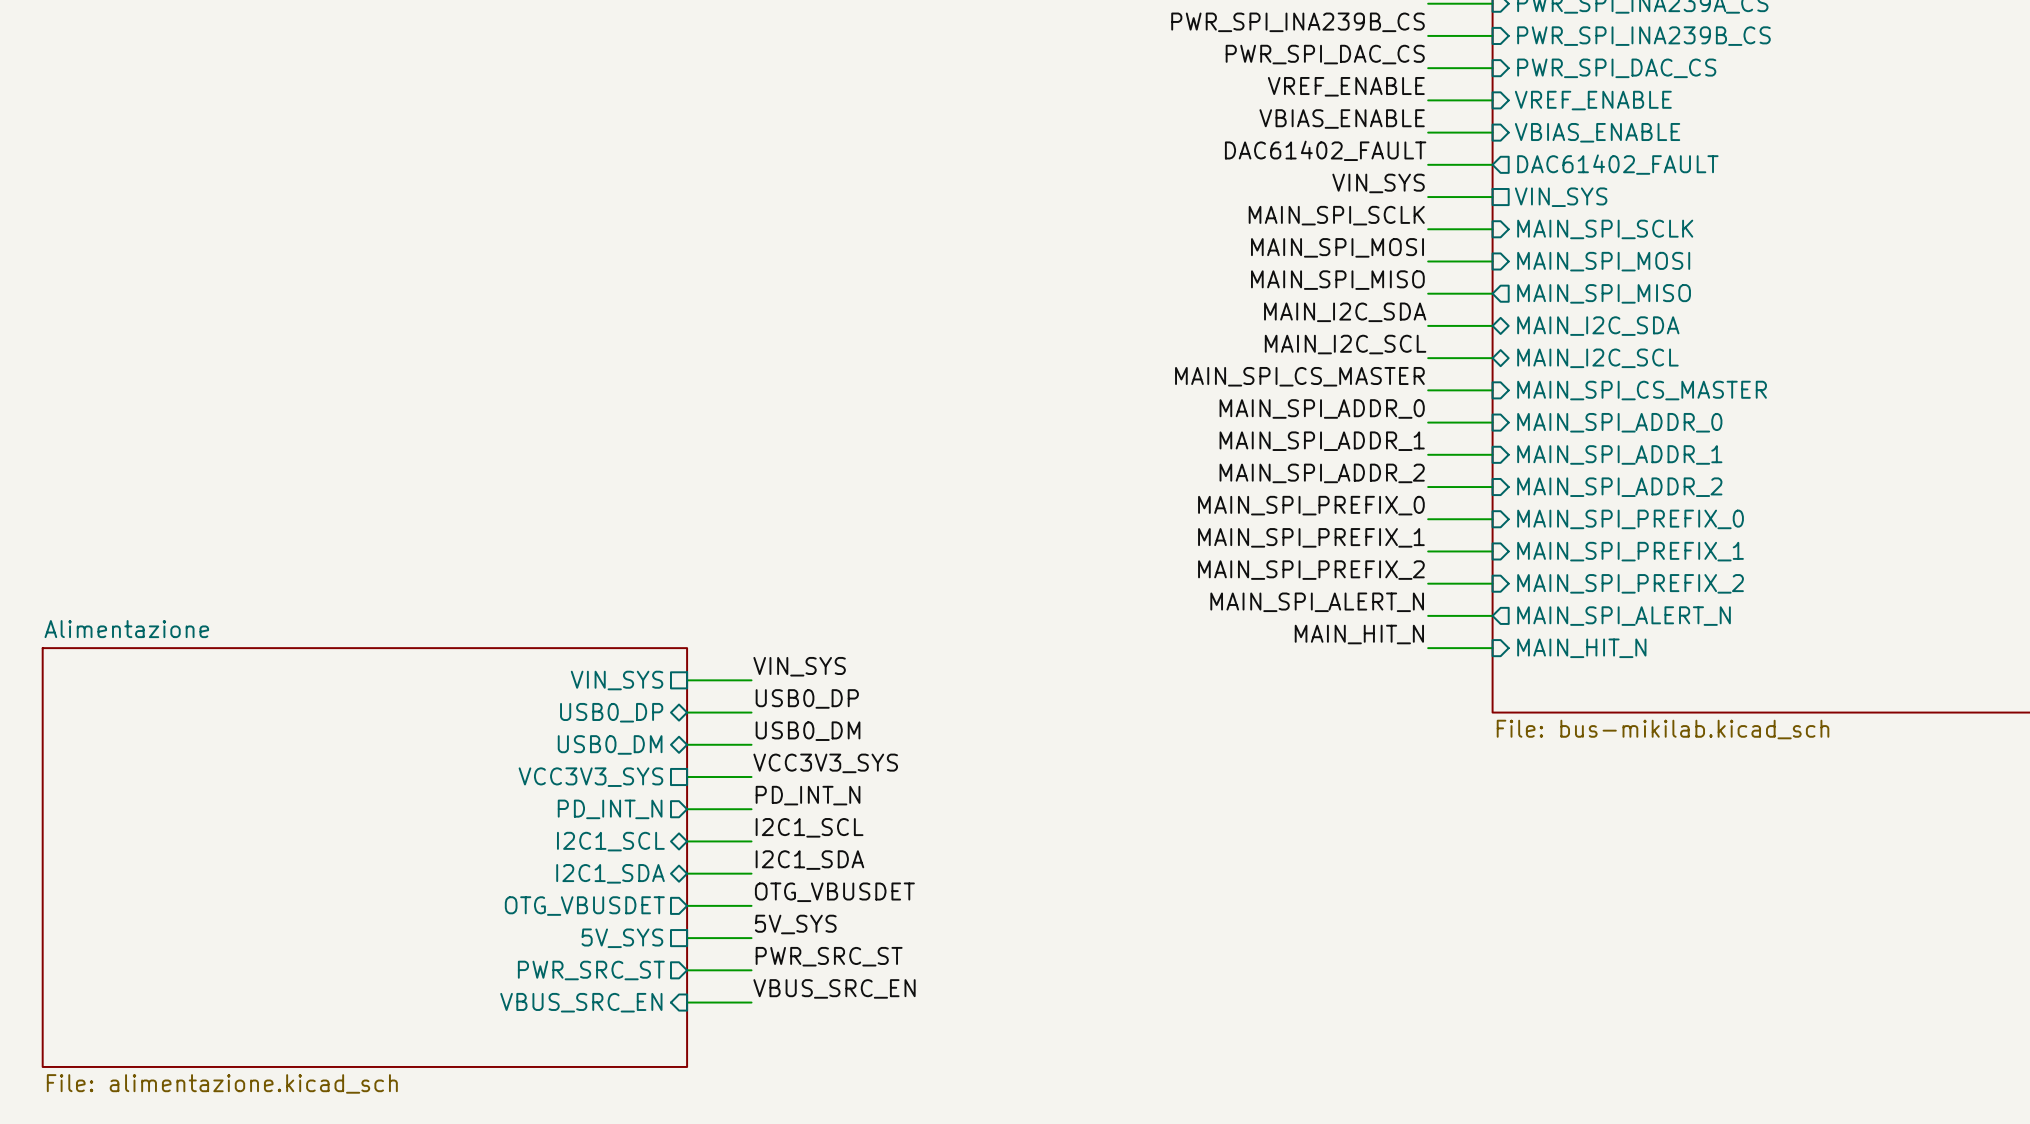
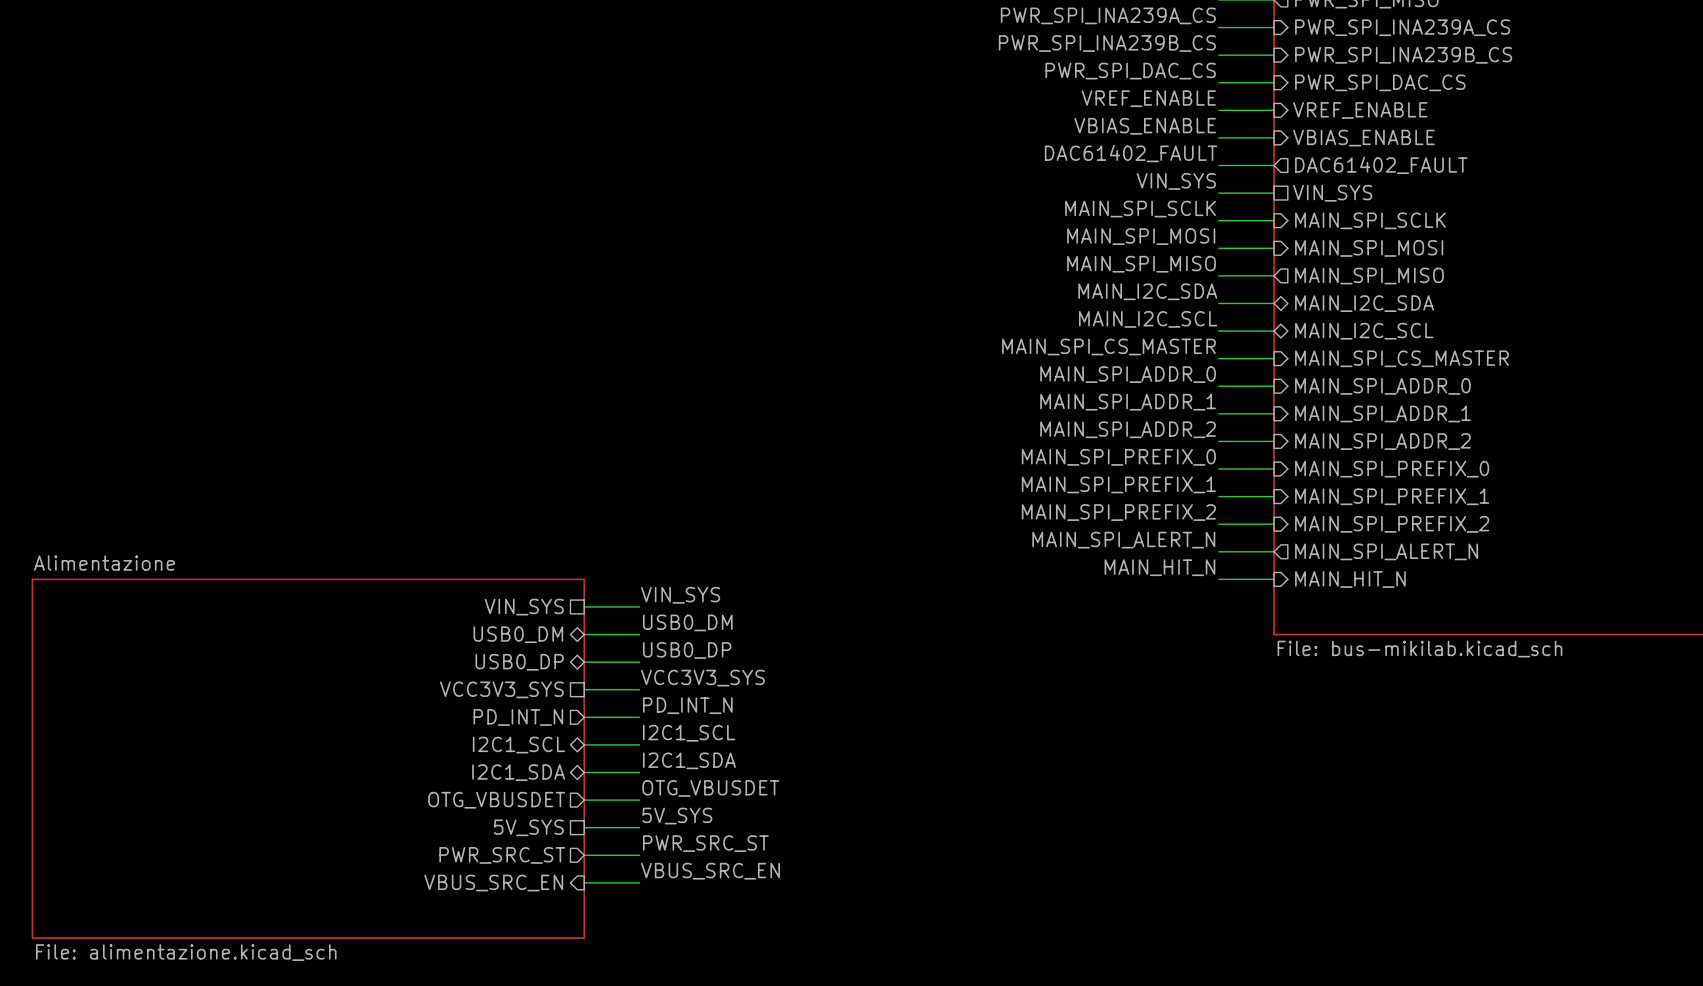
label: USB0_DP (807, 698) -> USB0_DM (687, 622)
sheet pin: USB0_DP (611, 712) -> USB0_DM (518, 634)
label: USB0_DM (808, 731) -> USB0_DP (687, 650)
sheet pin: USB0_DM (610, 744) -> USB0_DP (519, 662)

